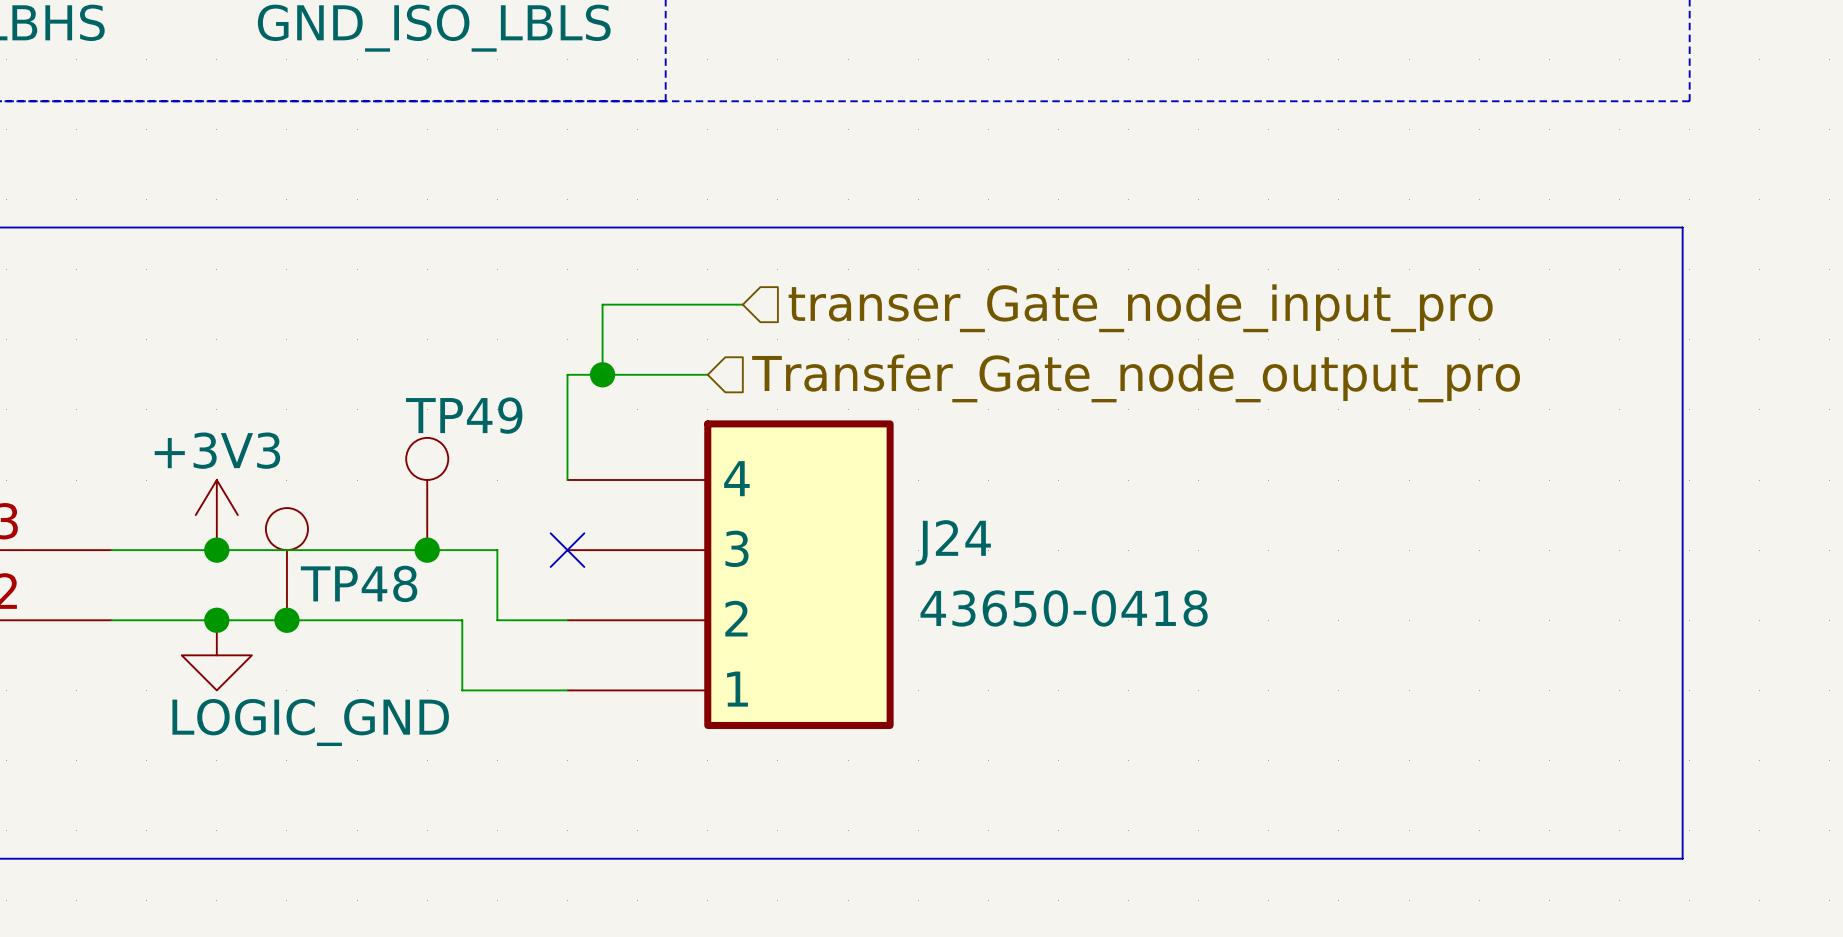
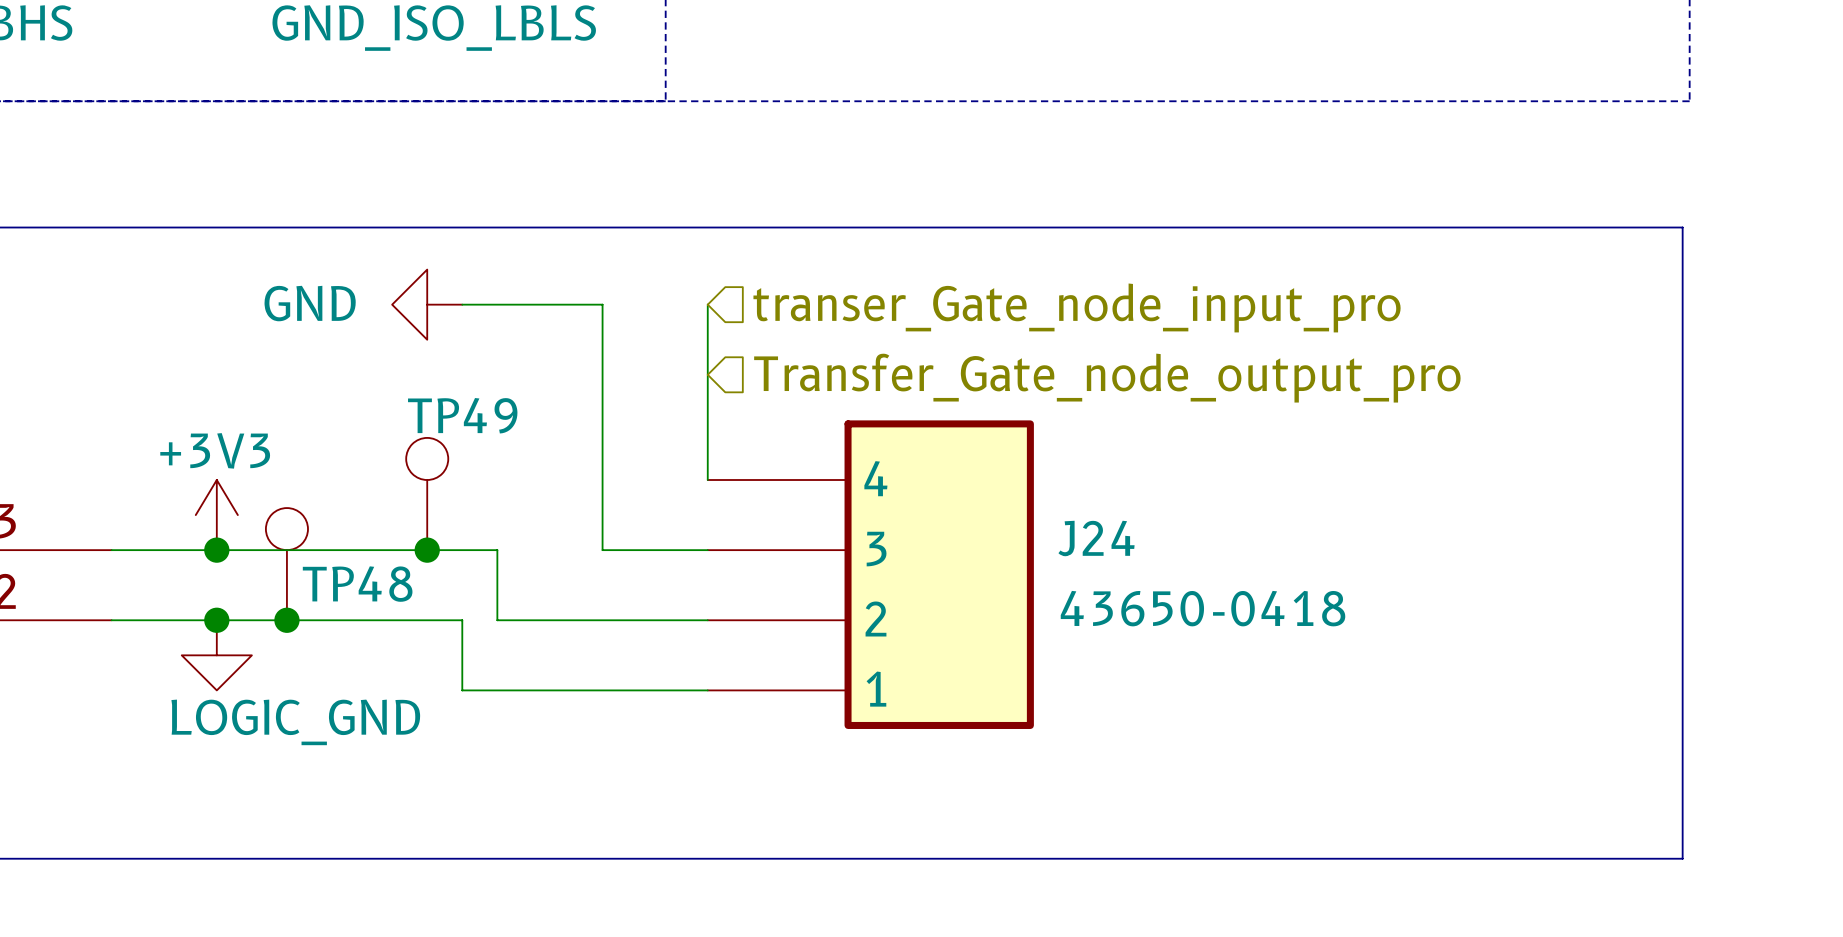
power symbol: none -> GND (427, 304)
wire: (602, 304) (742, 304) -> (602, 304) (462, 304)
wire: none -> (707, 304) (707, 480)
hierarchical label position: transer_Gate_node_input_pro (1140, 308) -> transer_Gate_node_input_pro (1077, 307)
wire: none -> (602, 374) (602, 550) (707, 550)
junction: (602, 374) -> none
wire: (707, 374) (567, 374) (567, 480) -> none
no-connect mark: (567, 550) -> none
J24 position: (730, 574) -> (870, 574)

